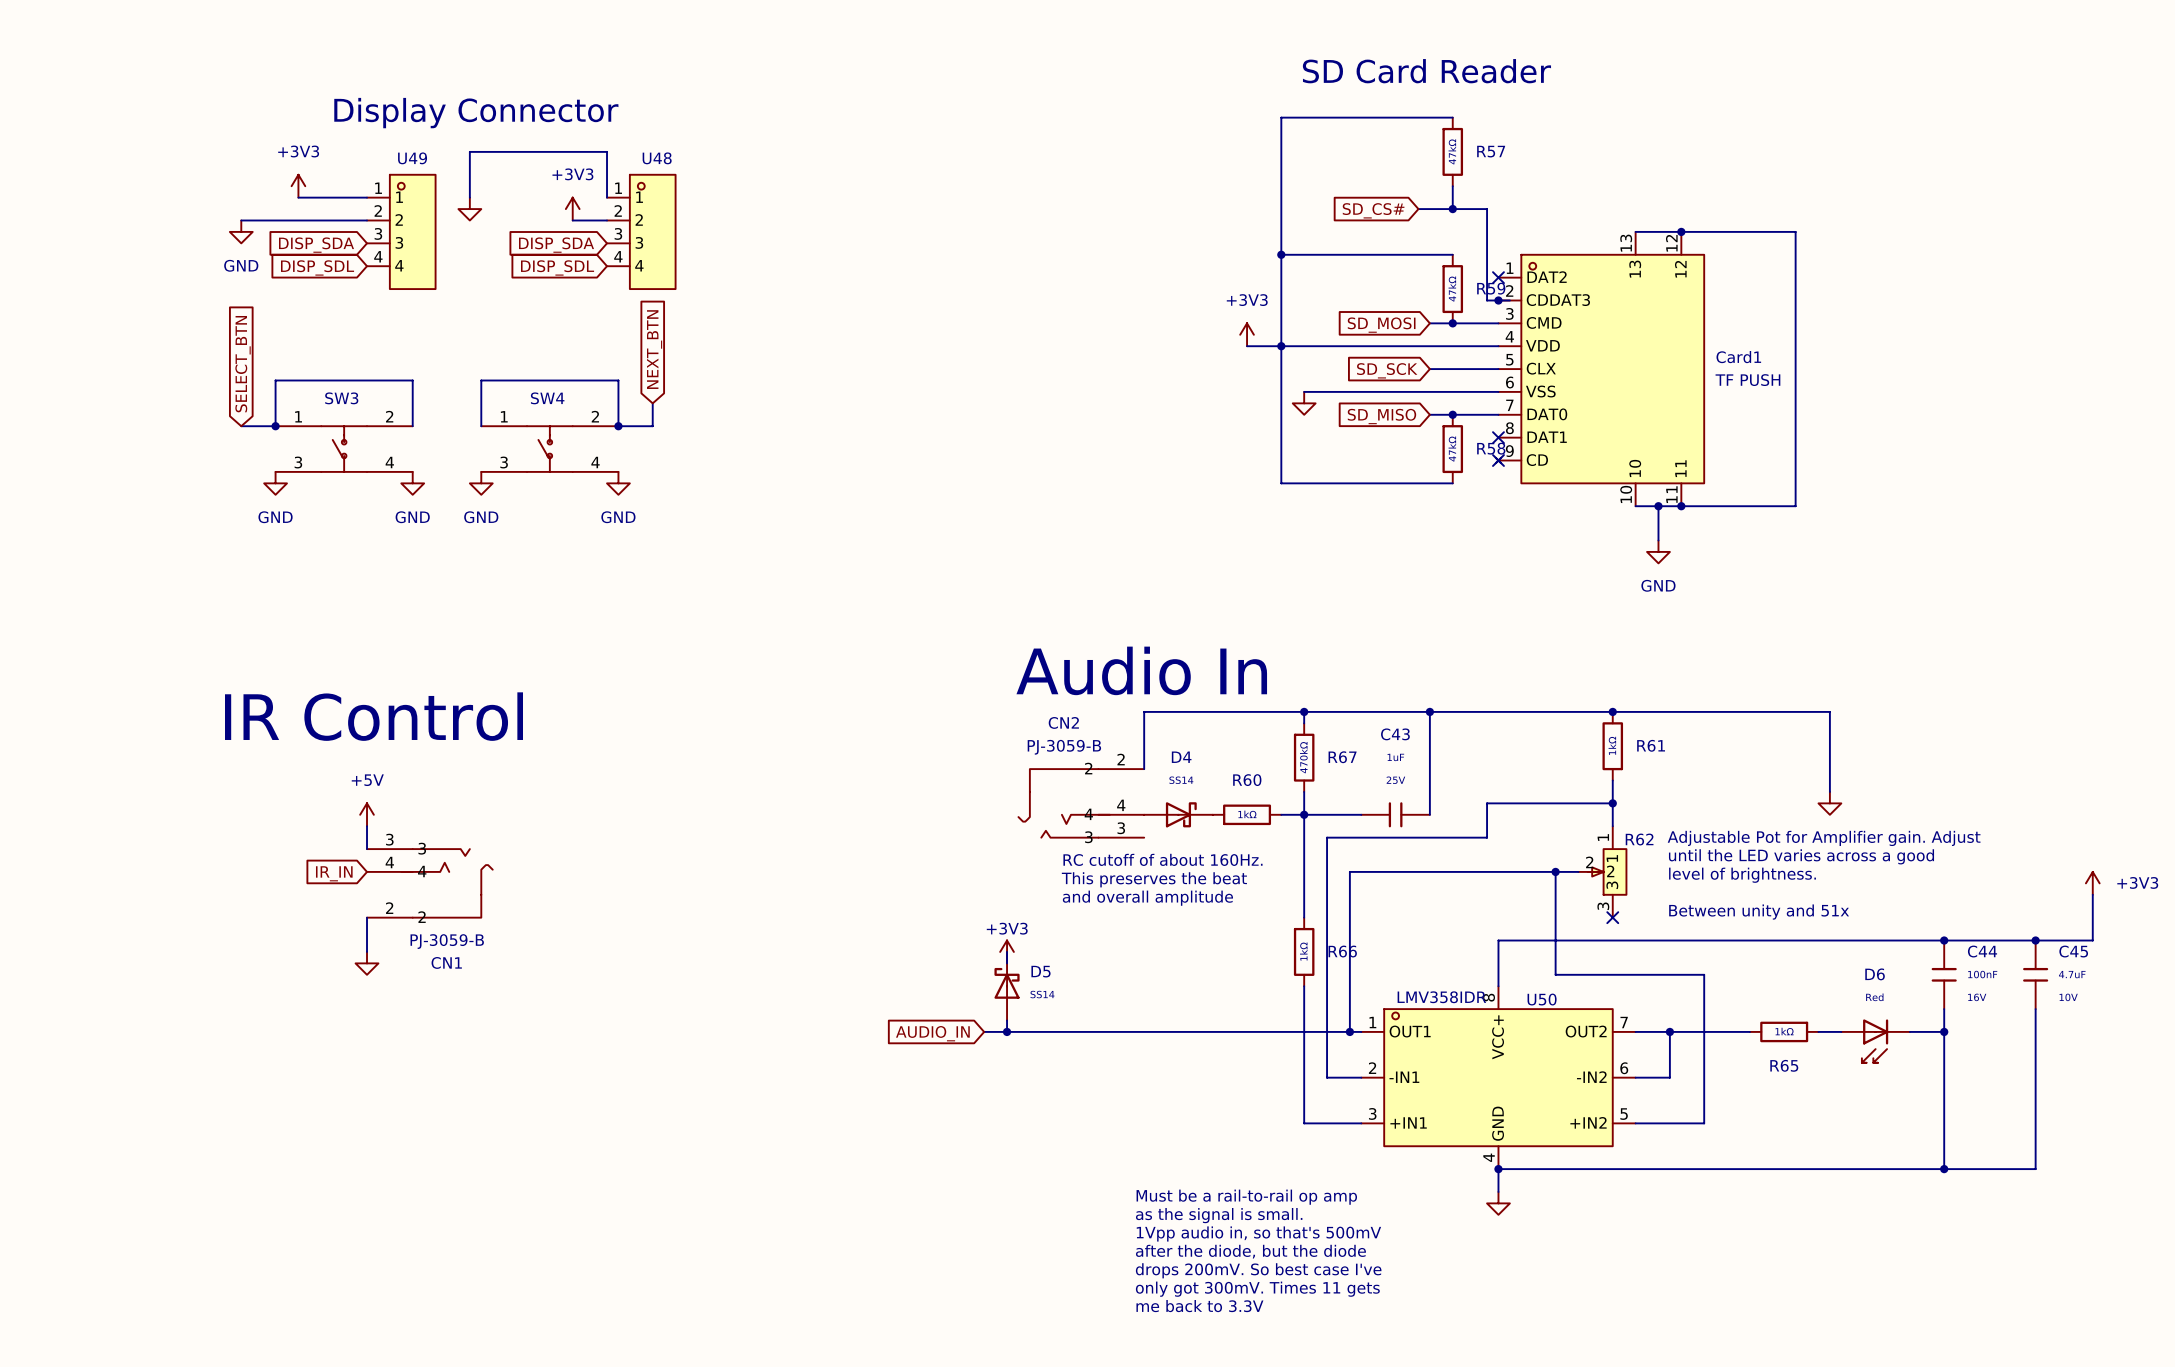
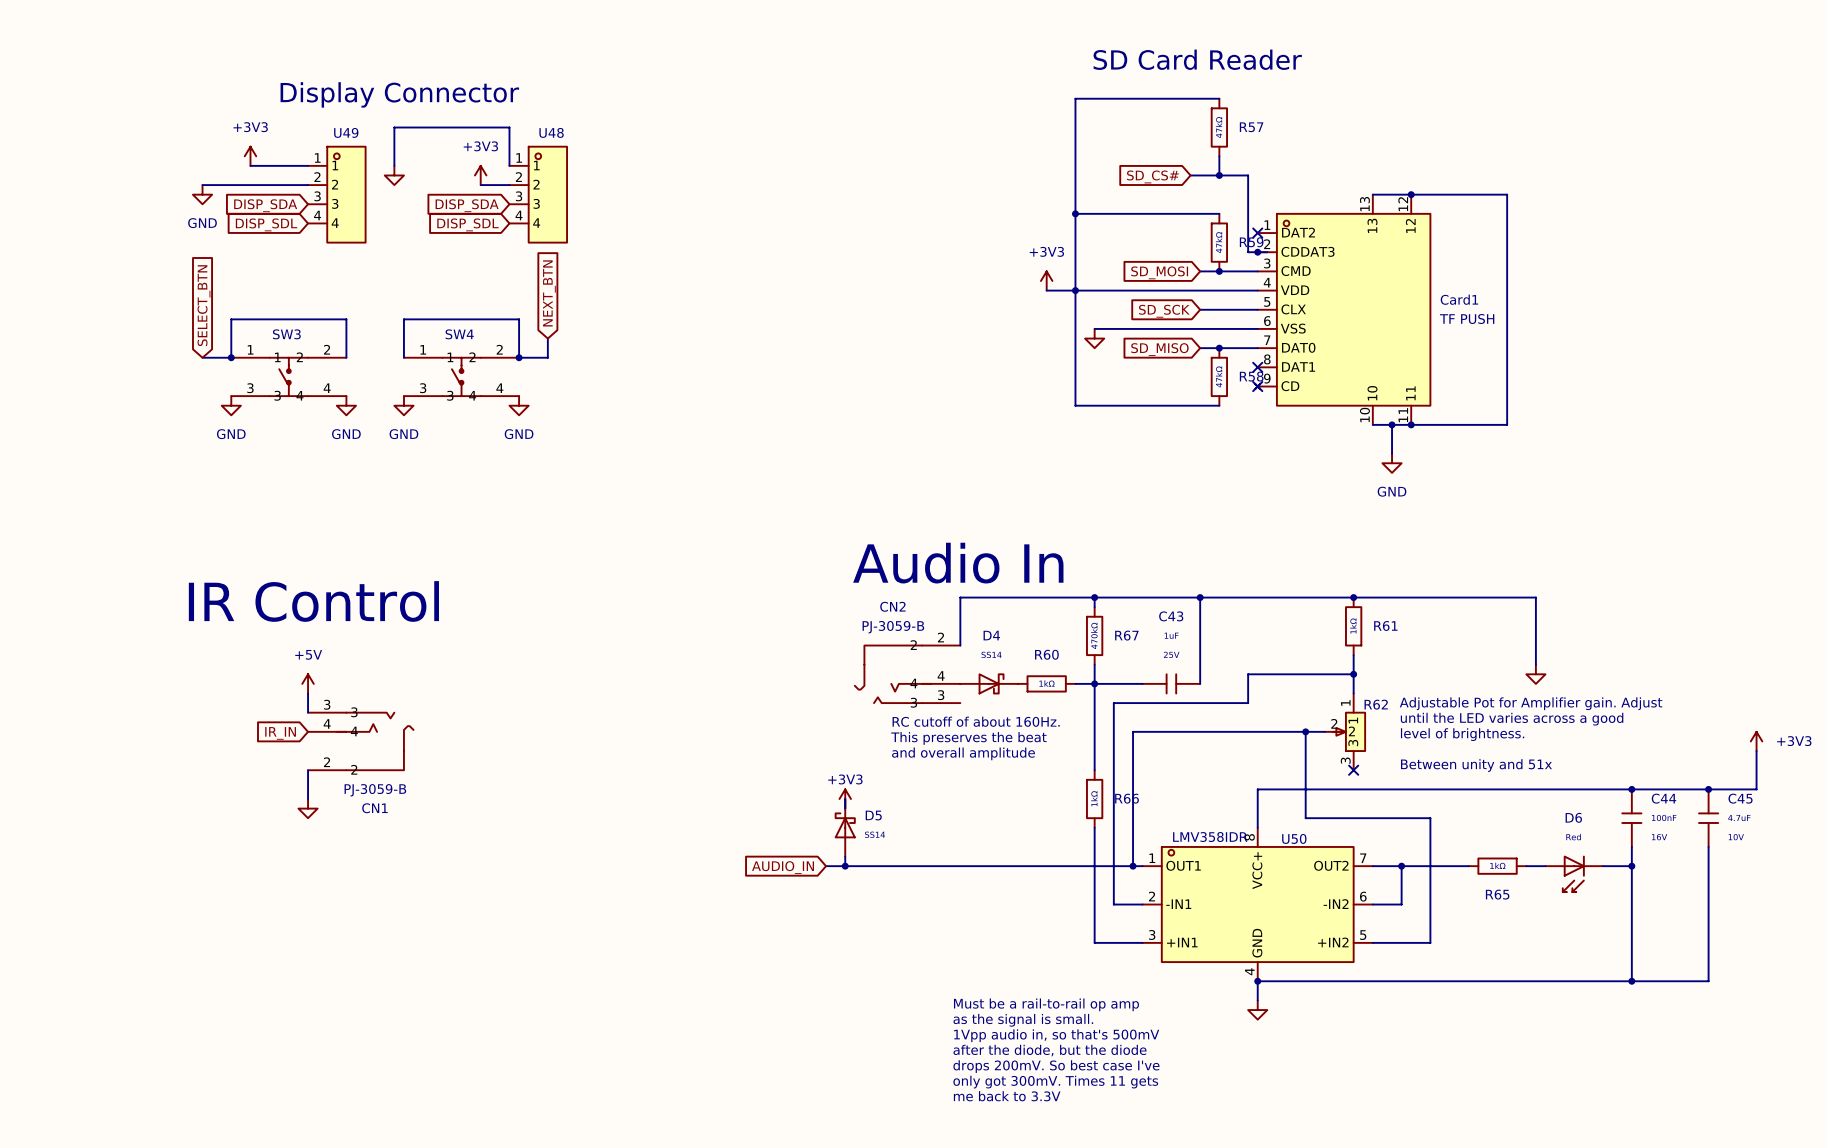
SW3 symbol: [275, 426, 413, 472] -> [231, 357, 347, 397]
SW4 symbol: [481, 426, 619, 472] -> [403, 357, 520, 397]

